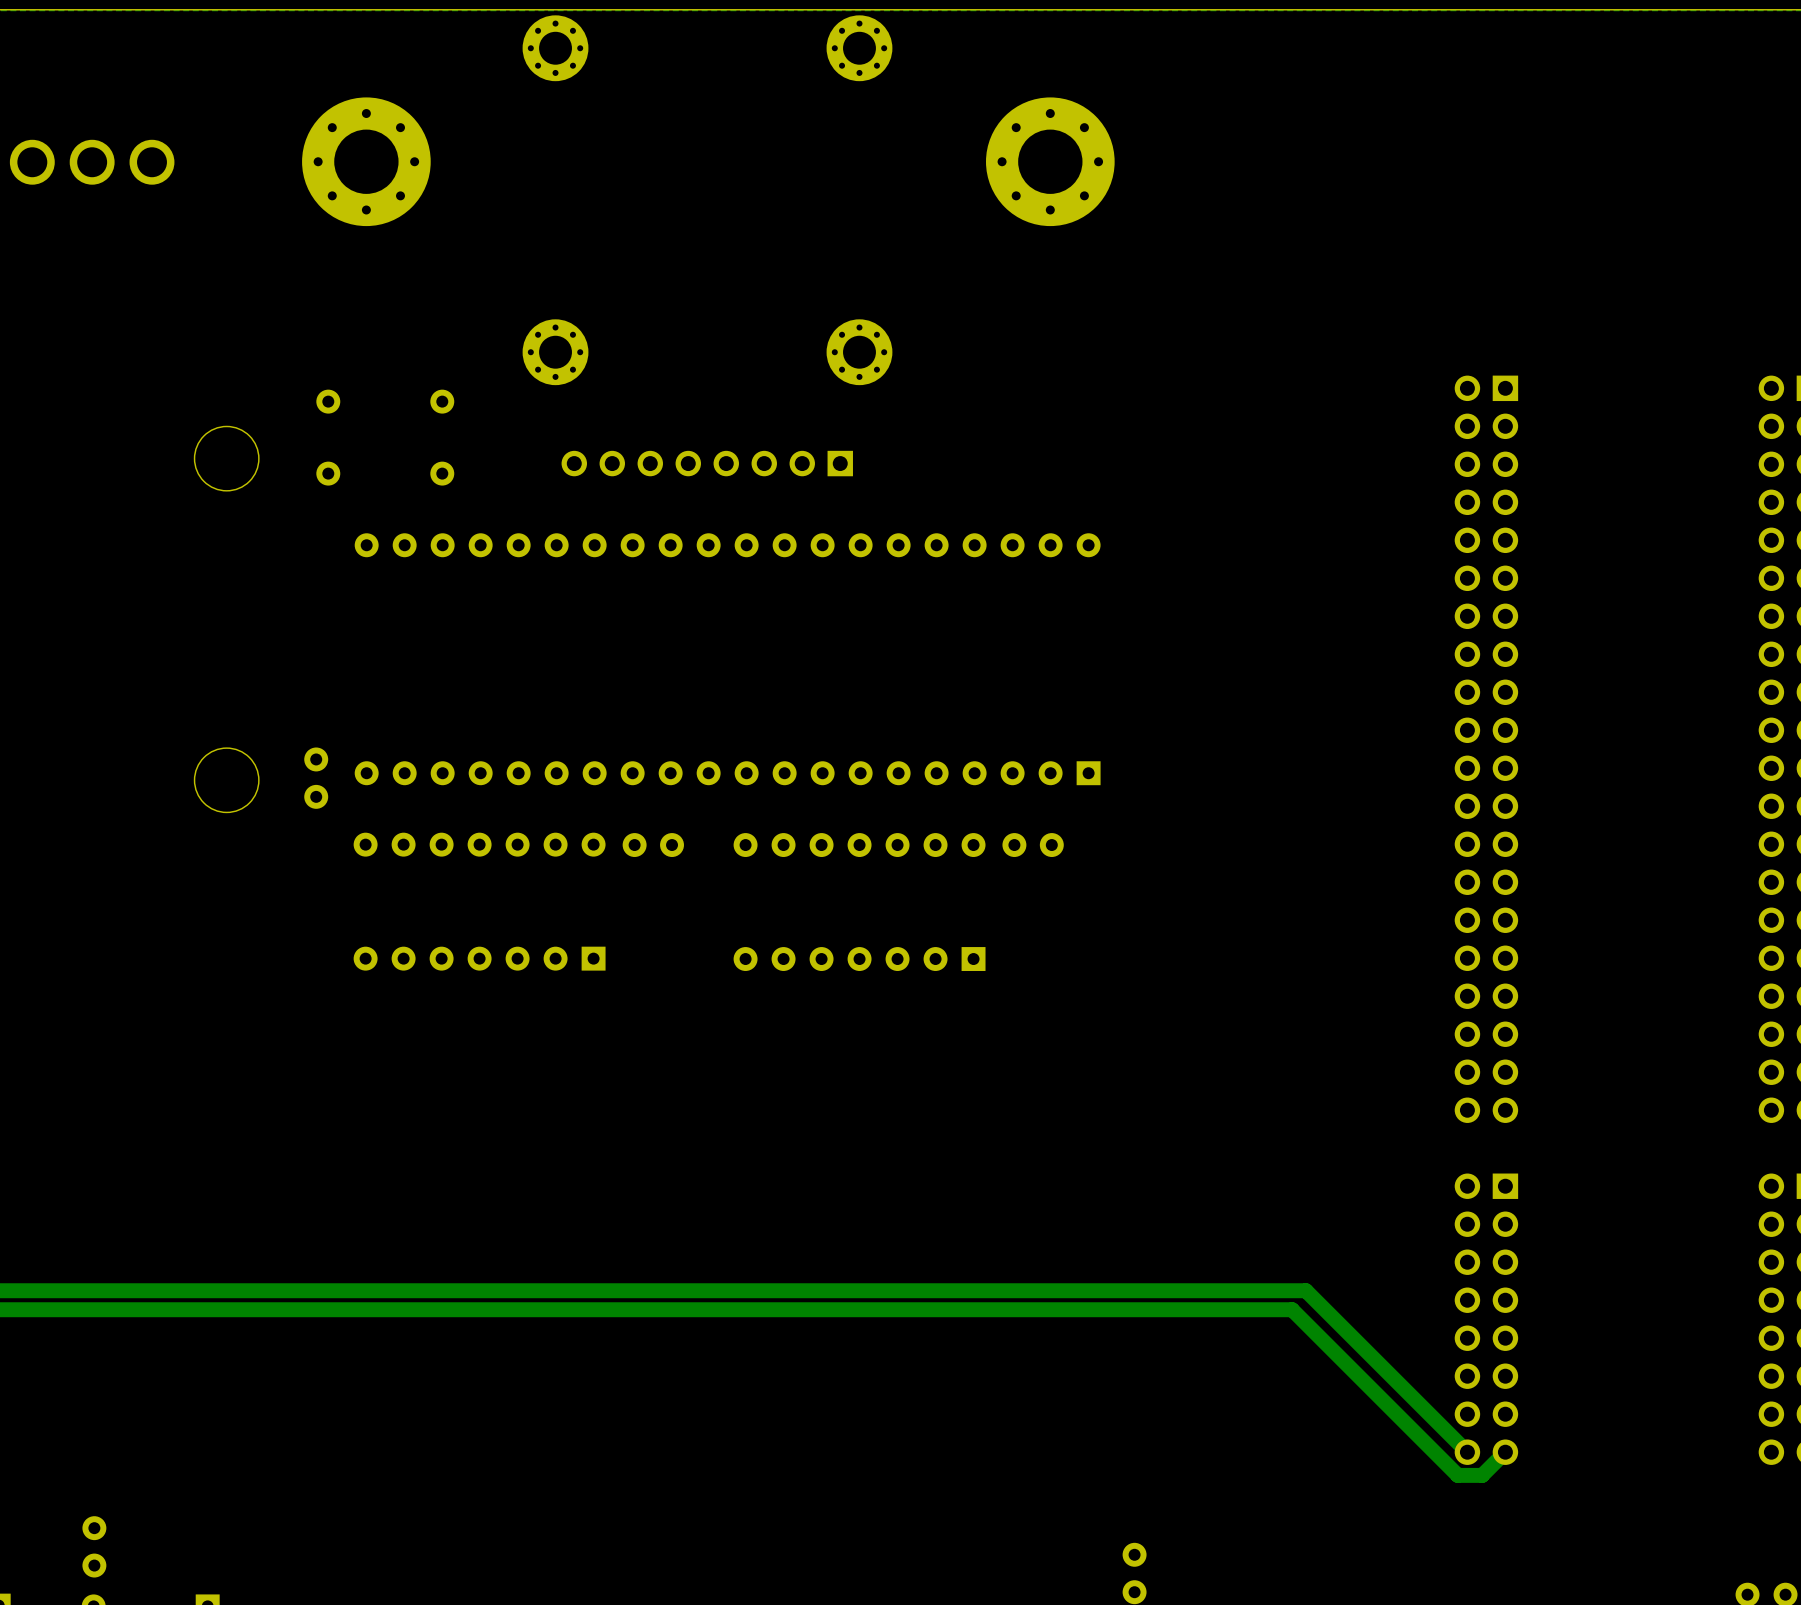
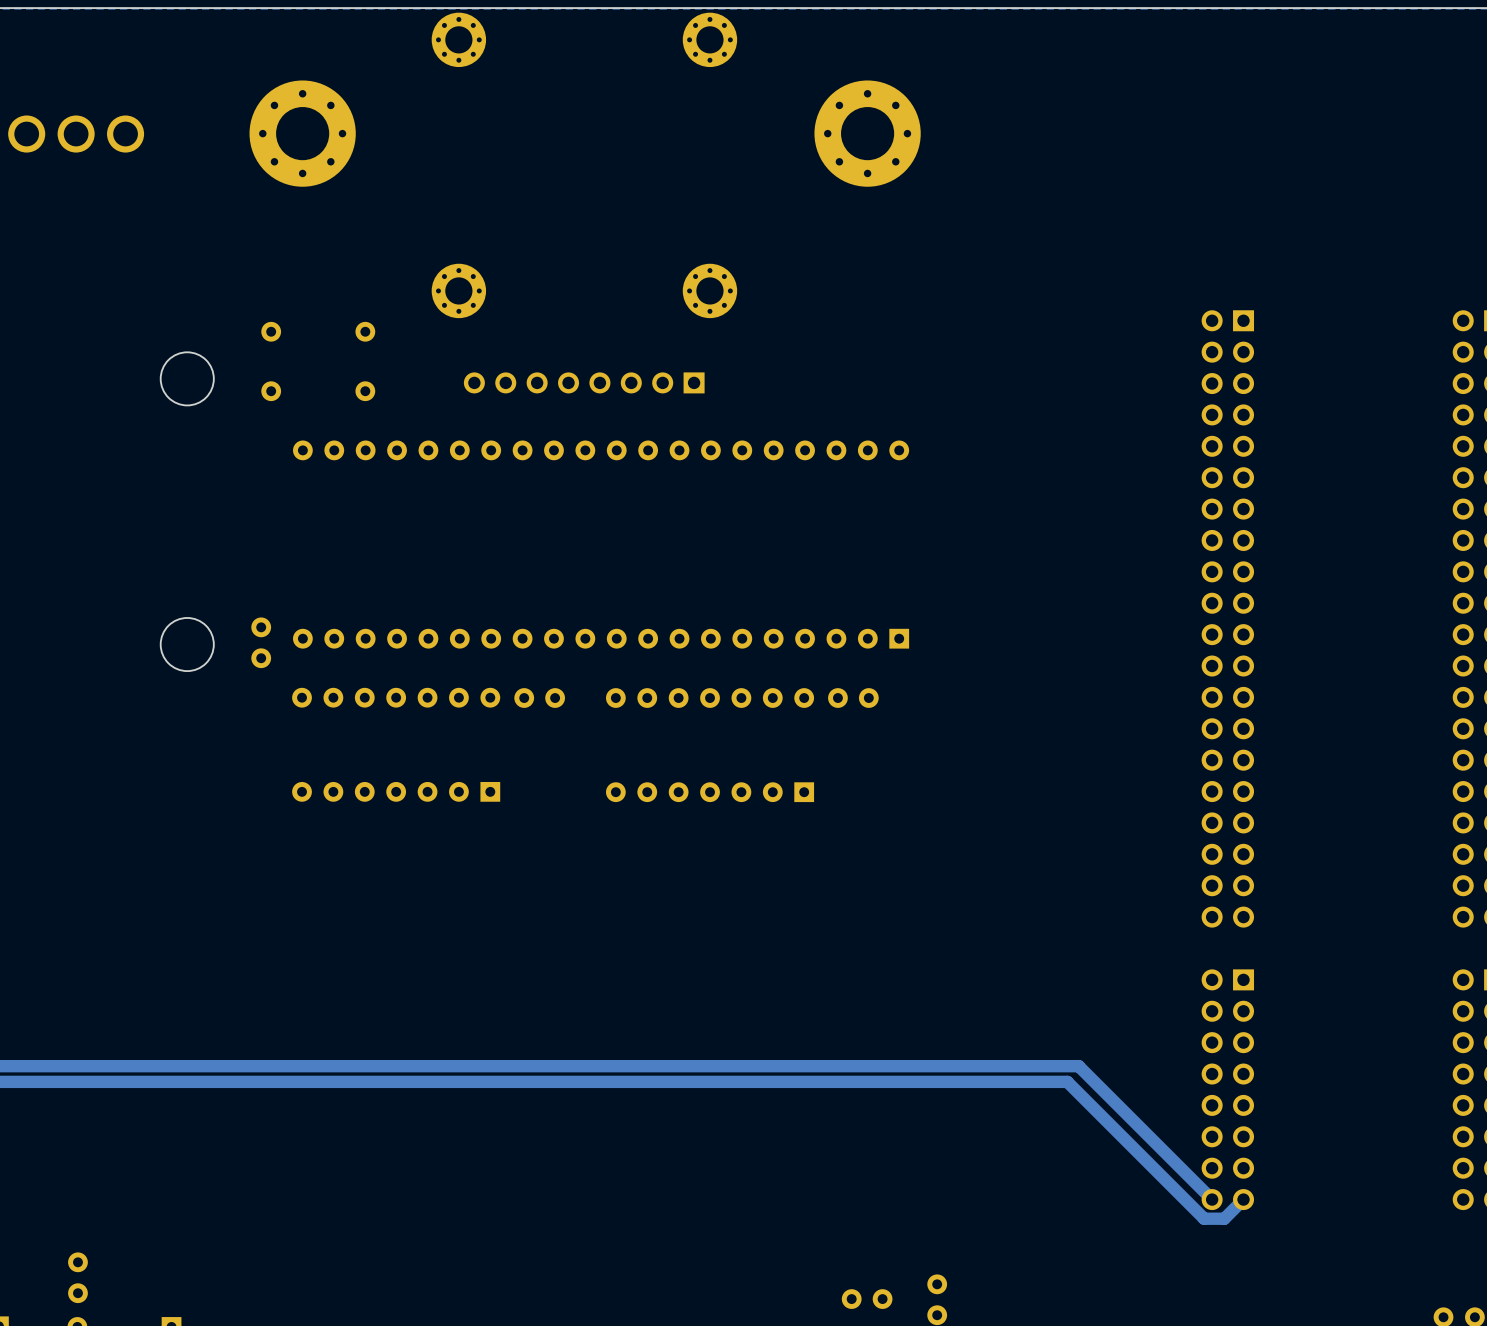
part: none -> (867, 1299)

